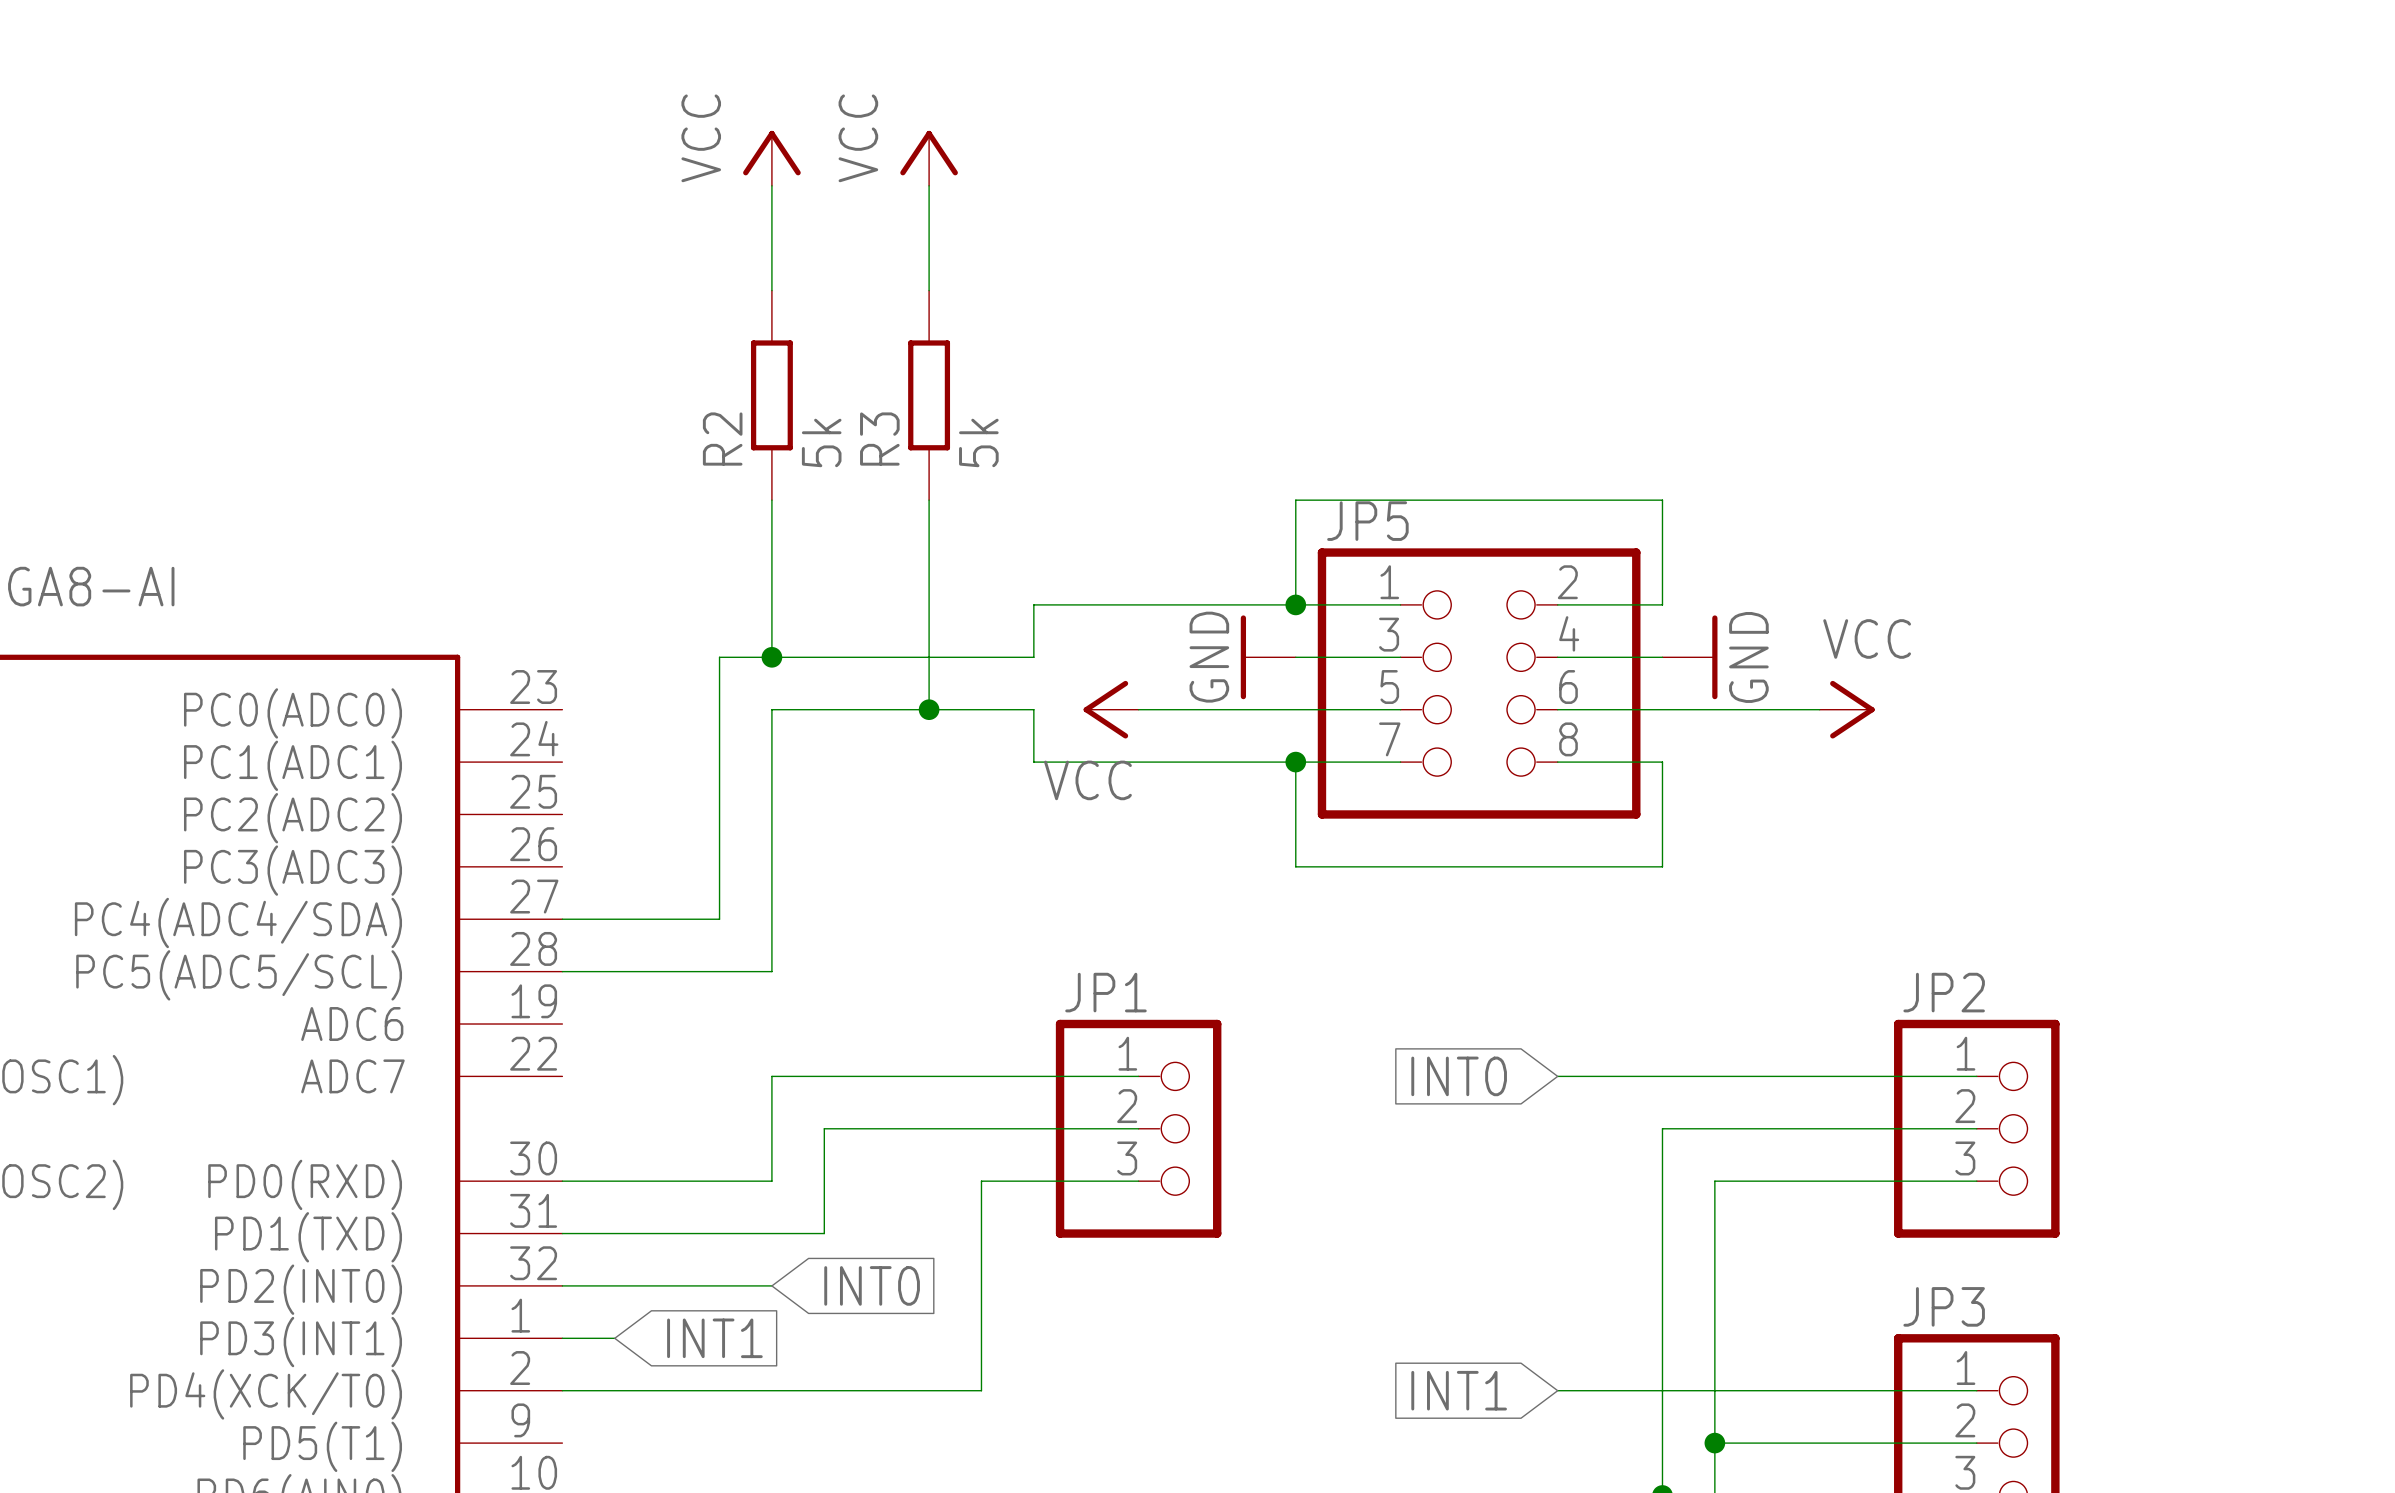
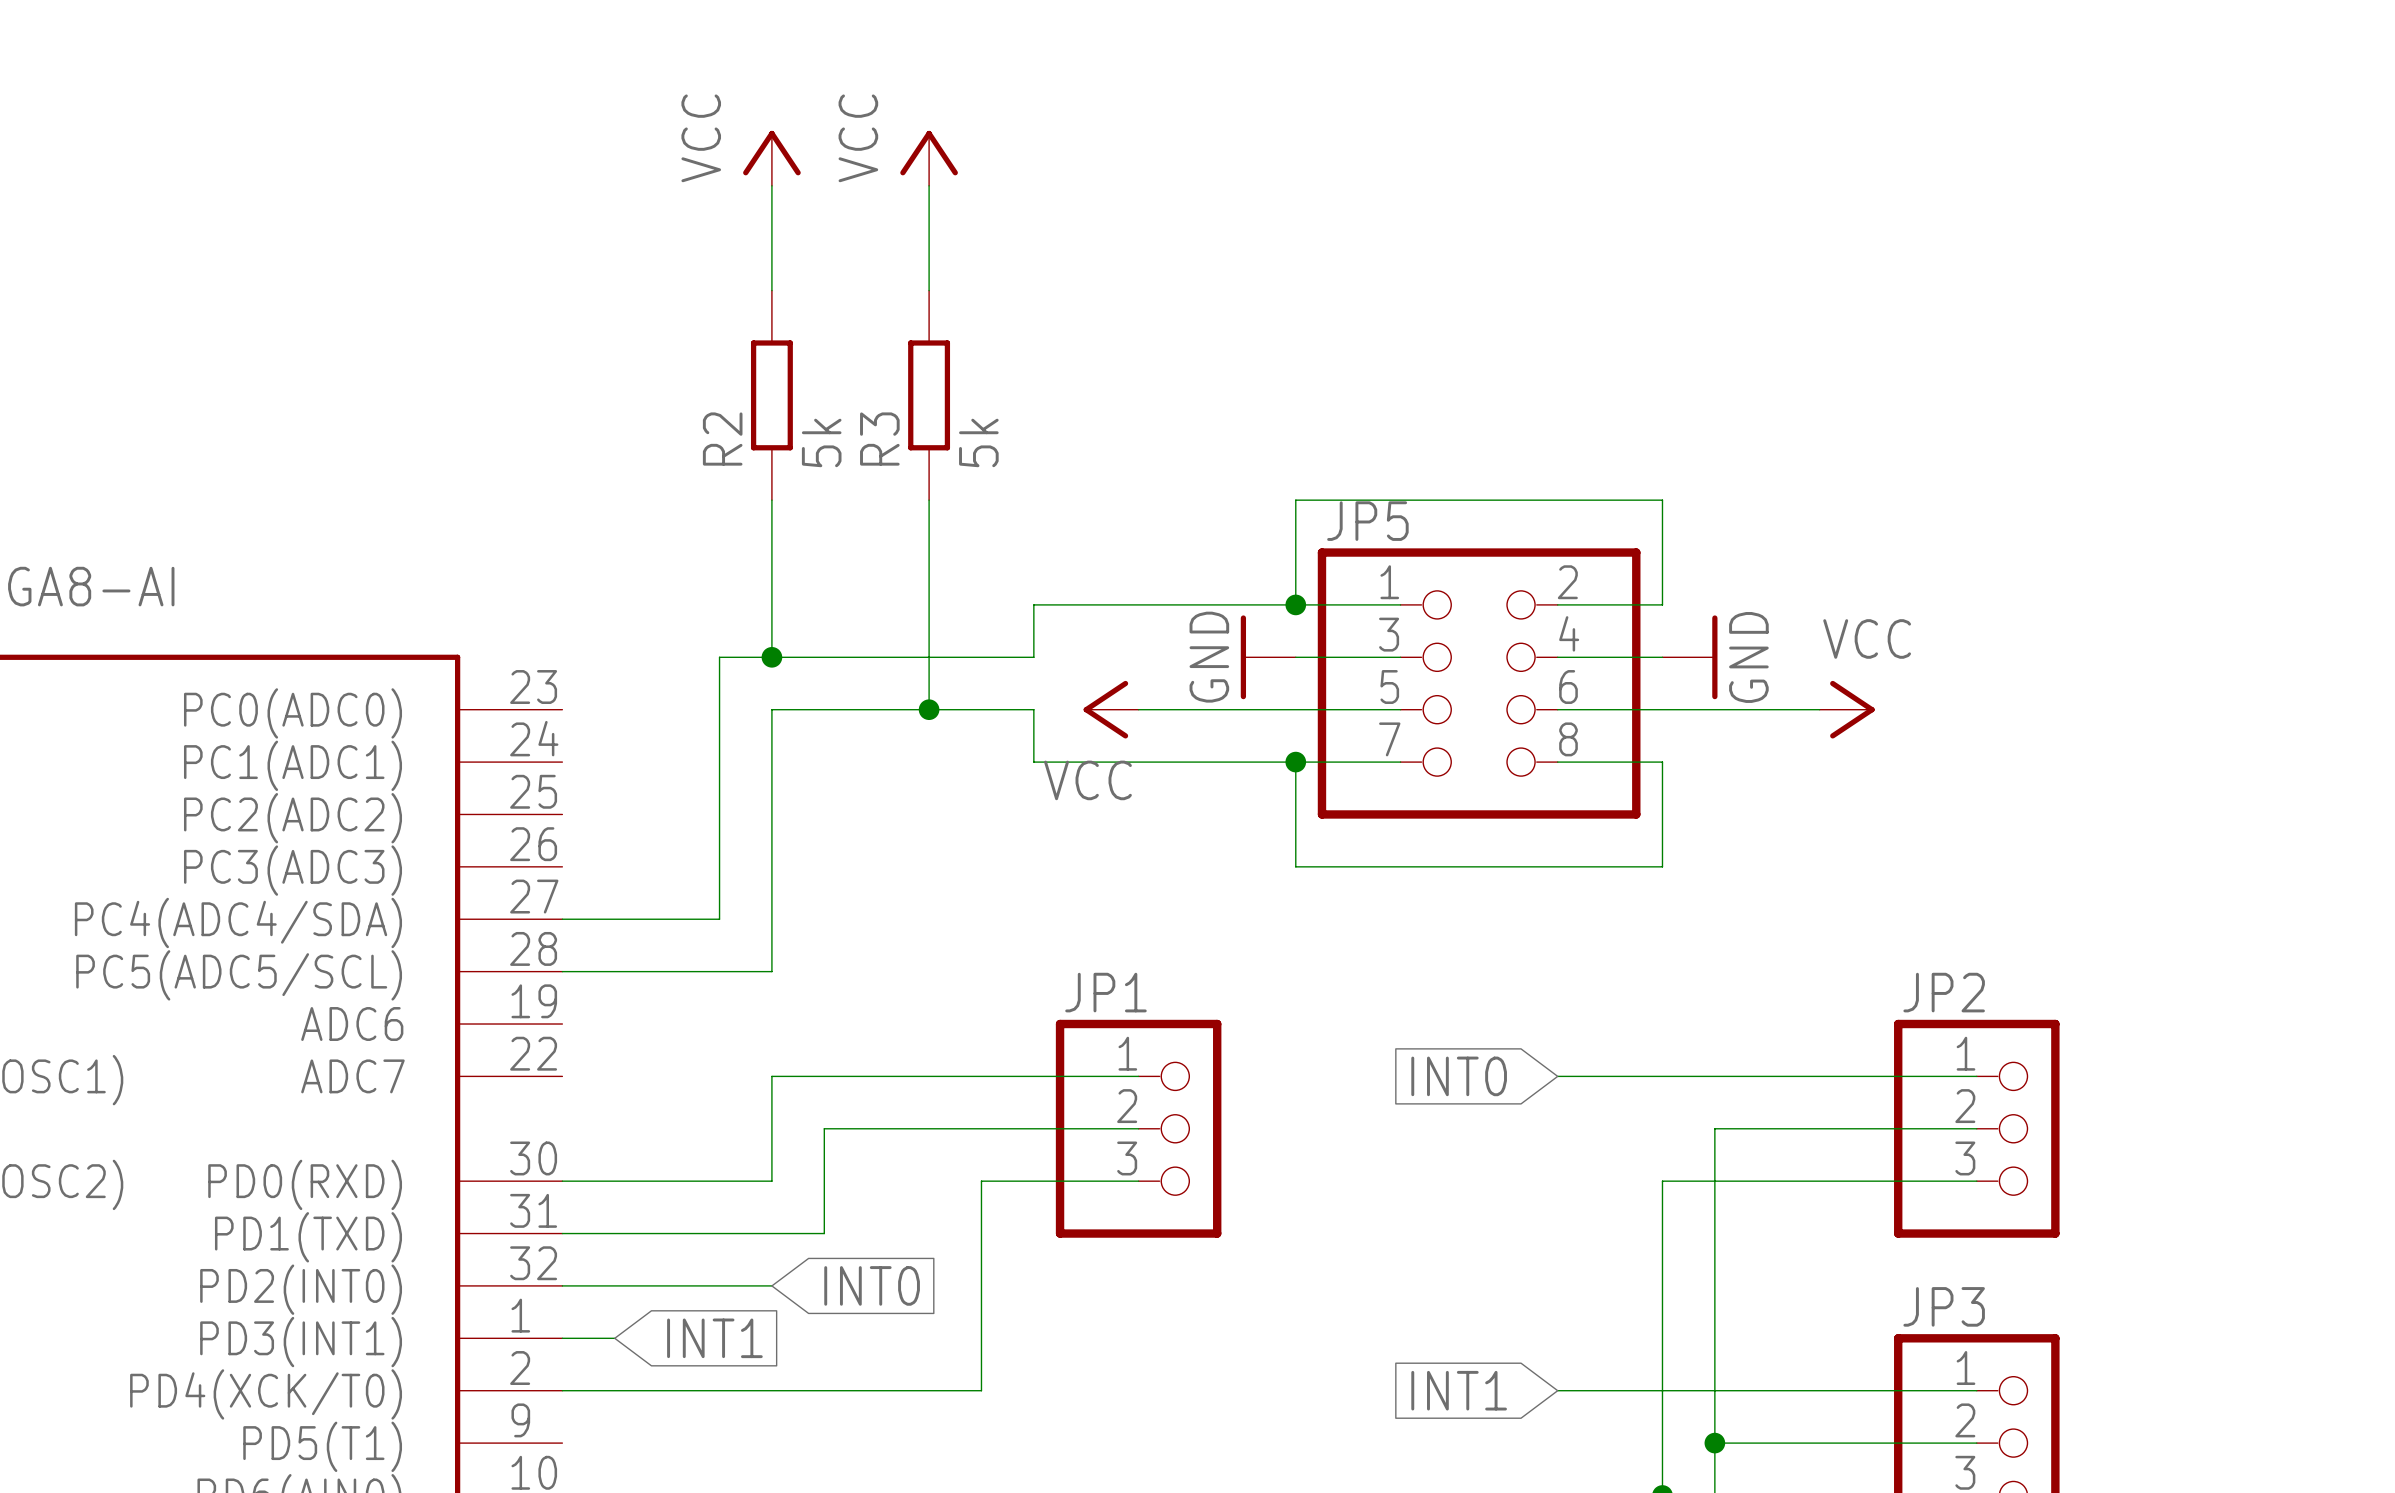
wire: (1714, 1128) (1662, 1128) (1662, 1181) -> (1714, 1128) (1714, 1181) (1662, 1181)

